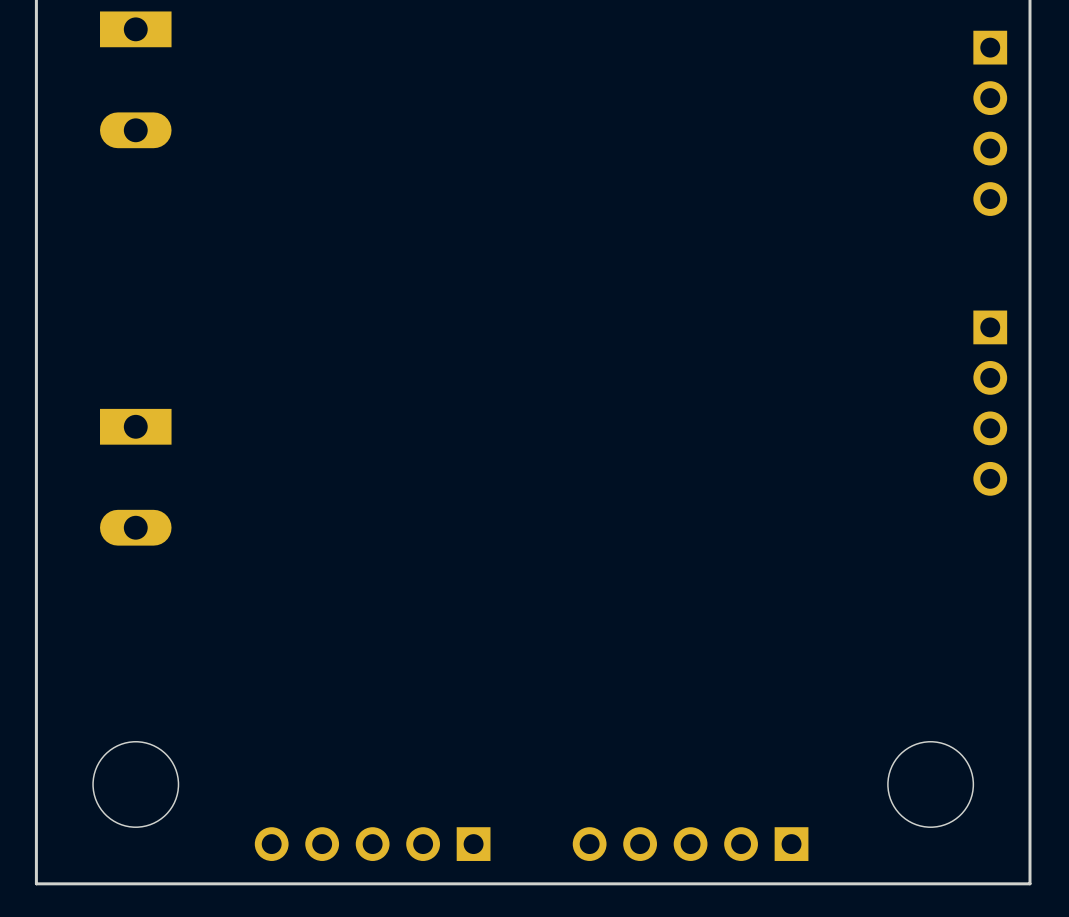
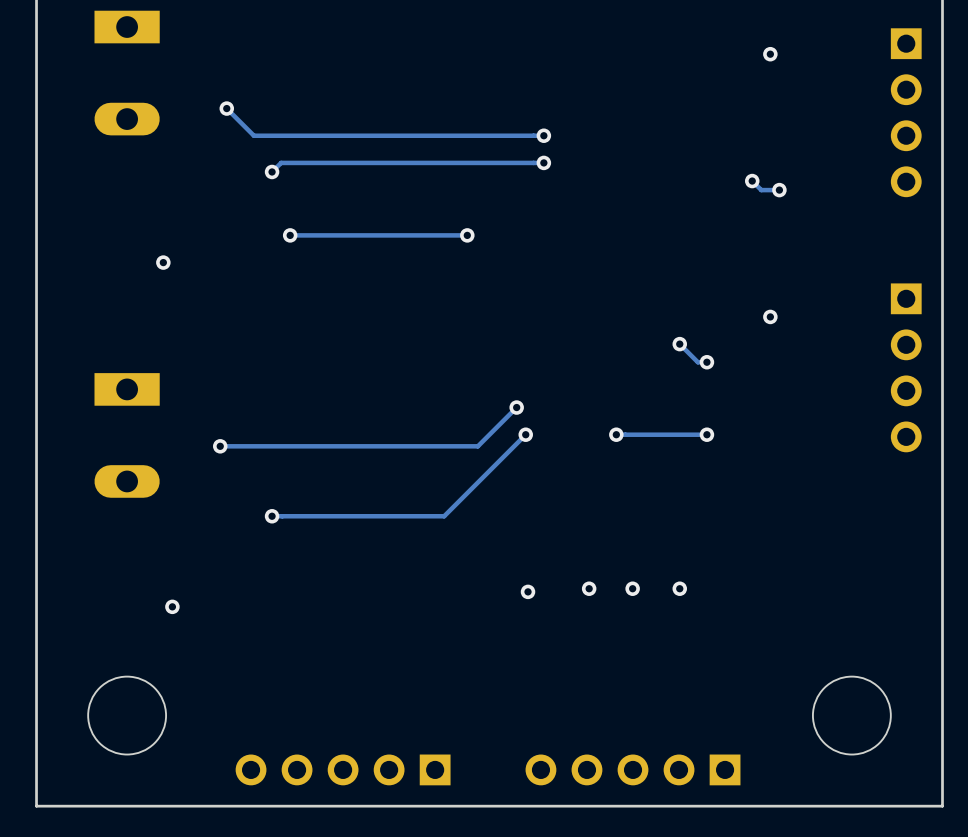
via: none -> (770, 54)
track: none -> (226, 108) (253, 135) (543, 135)
via: none -> (226, 108)
via: none -> (543, 135)
track: none -> (543, 162) (281, 162) (272, 171)
via: none -> (543, 162)
via: none -> (272, 171)
track: none -> (752, 181) (761, 190) (779, 190)
via: none -> (752, 181)
via: none -> (779, 190)
via: none -> (290, 235)
track: none -> (467, 235) (290, 235)
via: none -> (467, 235)
via: none -> (163, 262)
via: none -> (770, 316)
track: none -> (679, 344) (697, 362) (706, 362)
via: none -> (679, 344)
via: none -> (706, 362)
track: none -> (516, 407) (477, 446) (220, 446)
via: none -> (516, 407)
track: none -> (525, 434) (444, 516) (272, 516)
via: none -> (525, 434)
via: none -> (616, 434)
track: none -> (706, 434) (616, 434)
via: none -> (706, 434)
via: none -> (220, 446)
via: none -> (272, 516)
via: none -> (589, 588)
via: none -> (632, 588)
via: none -> (679, 588)
via: none -> (528, 591)
via: none -> (172, 606)

